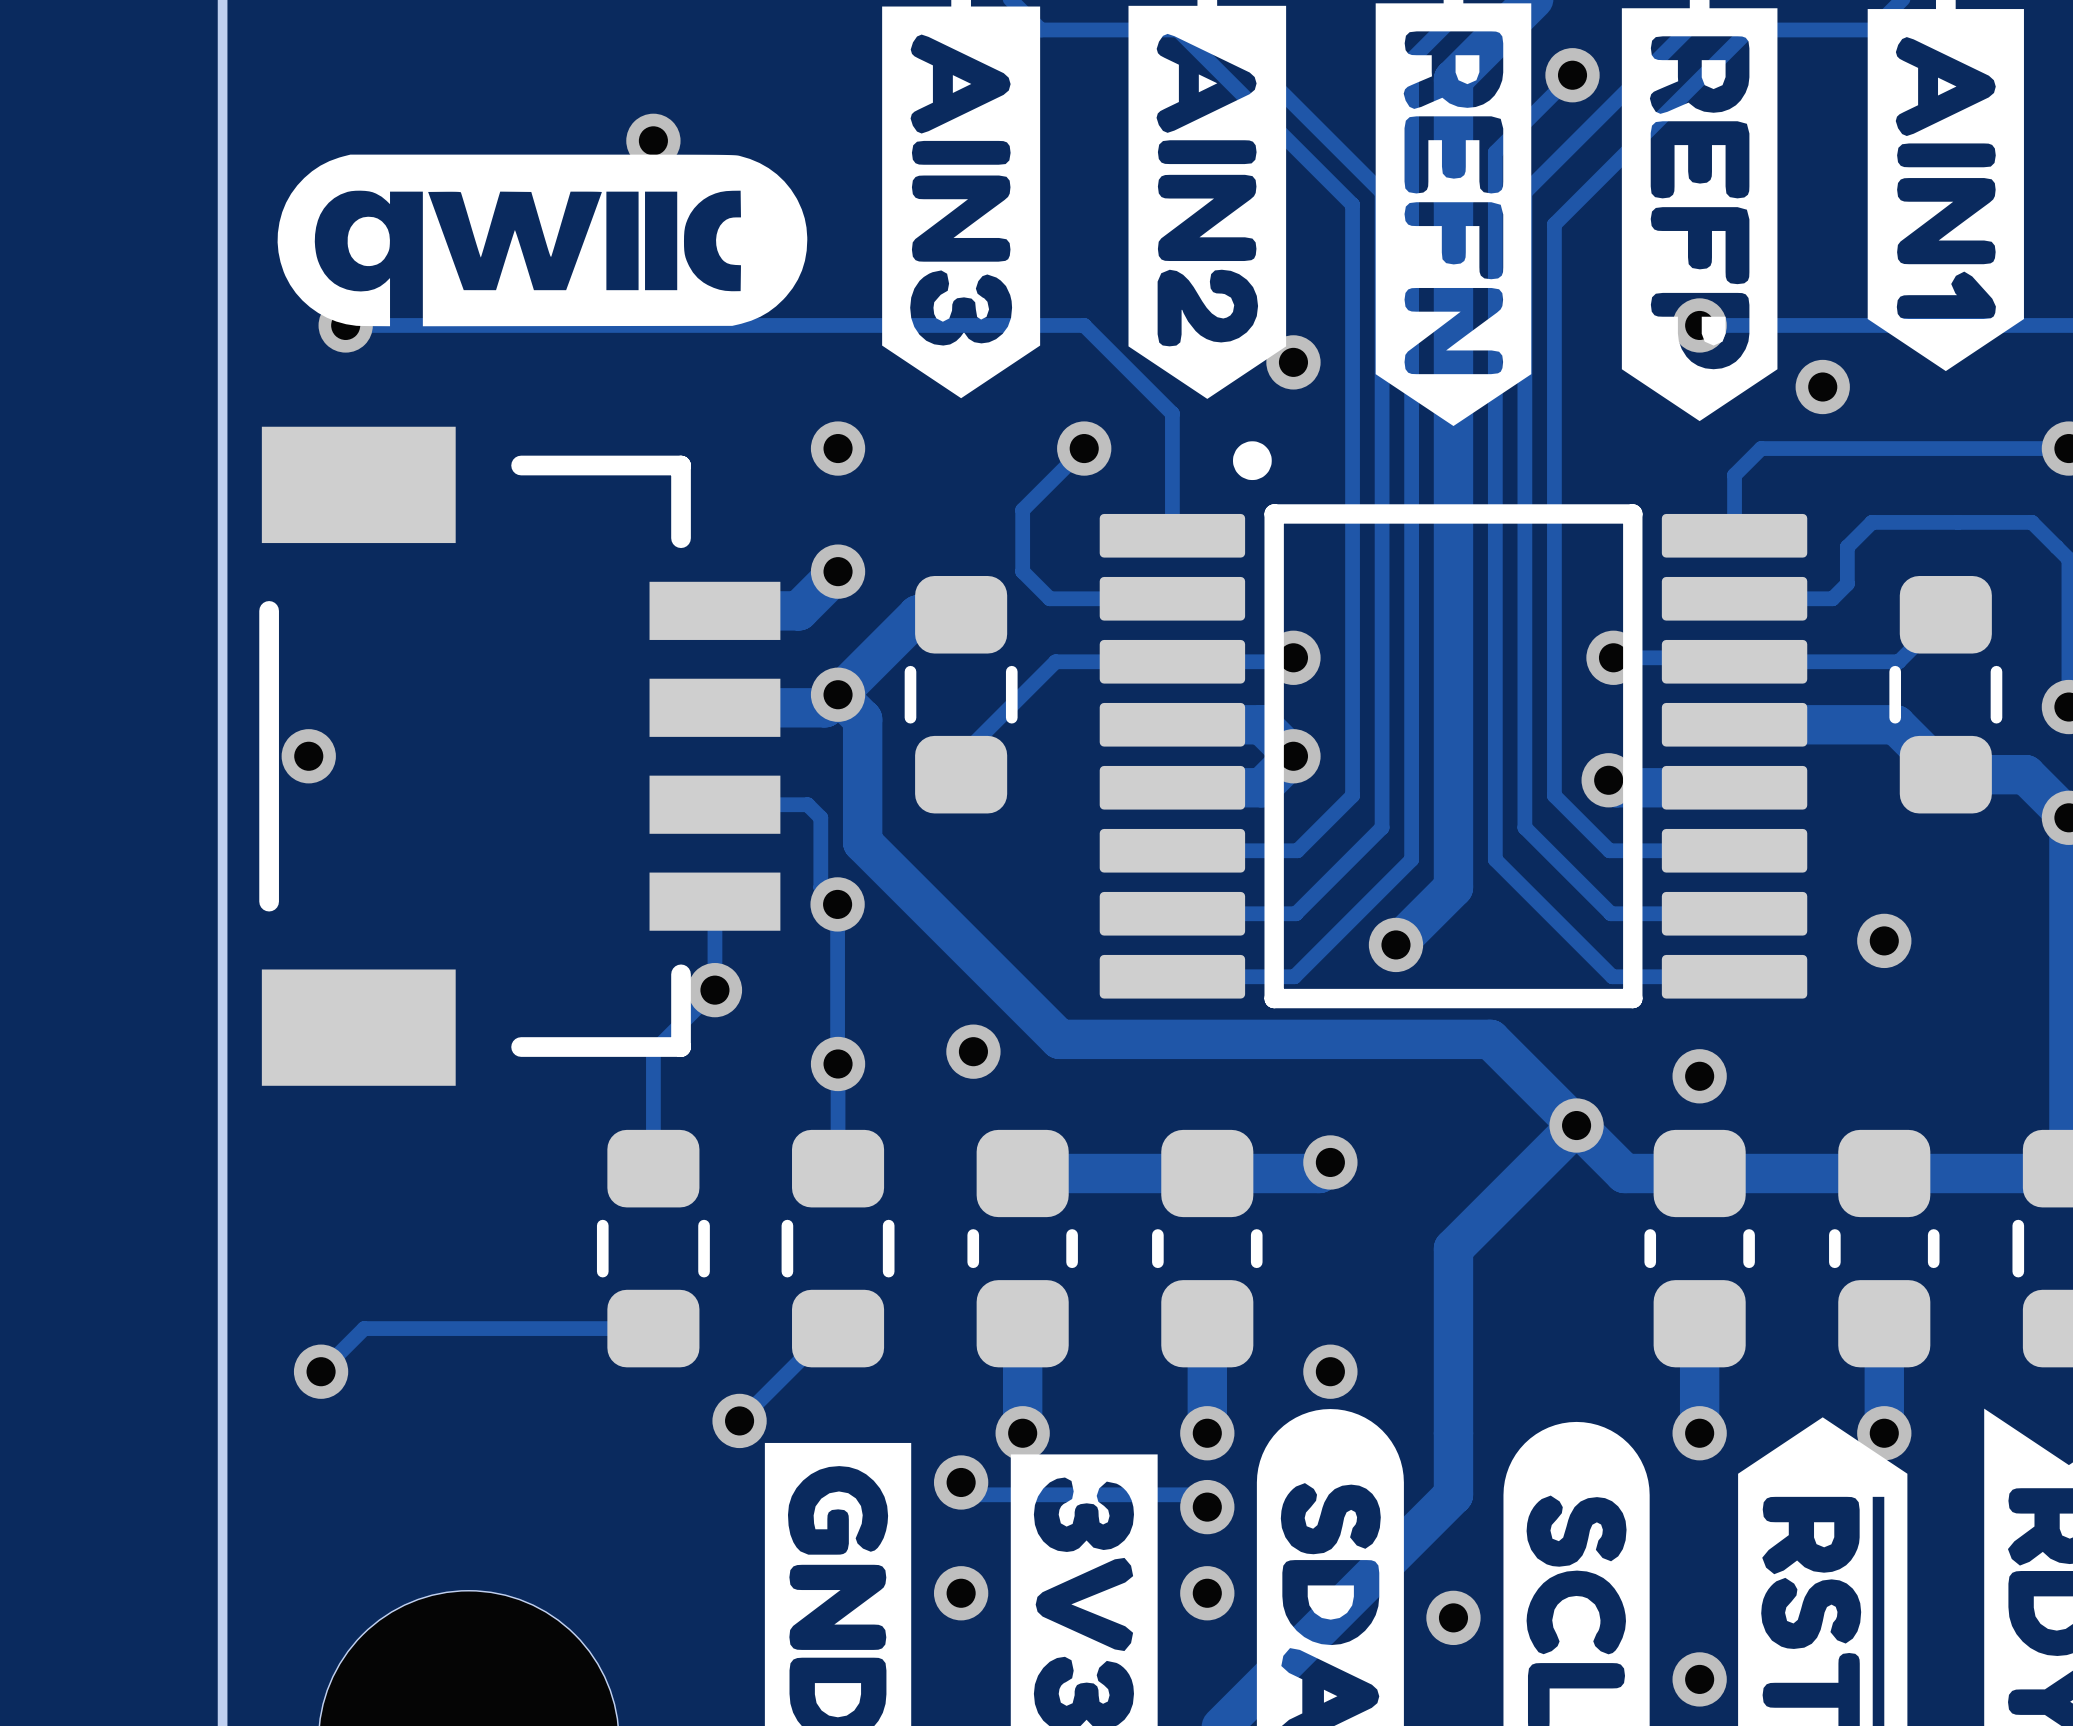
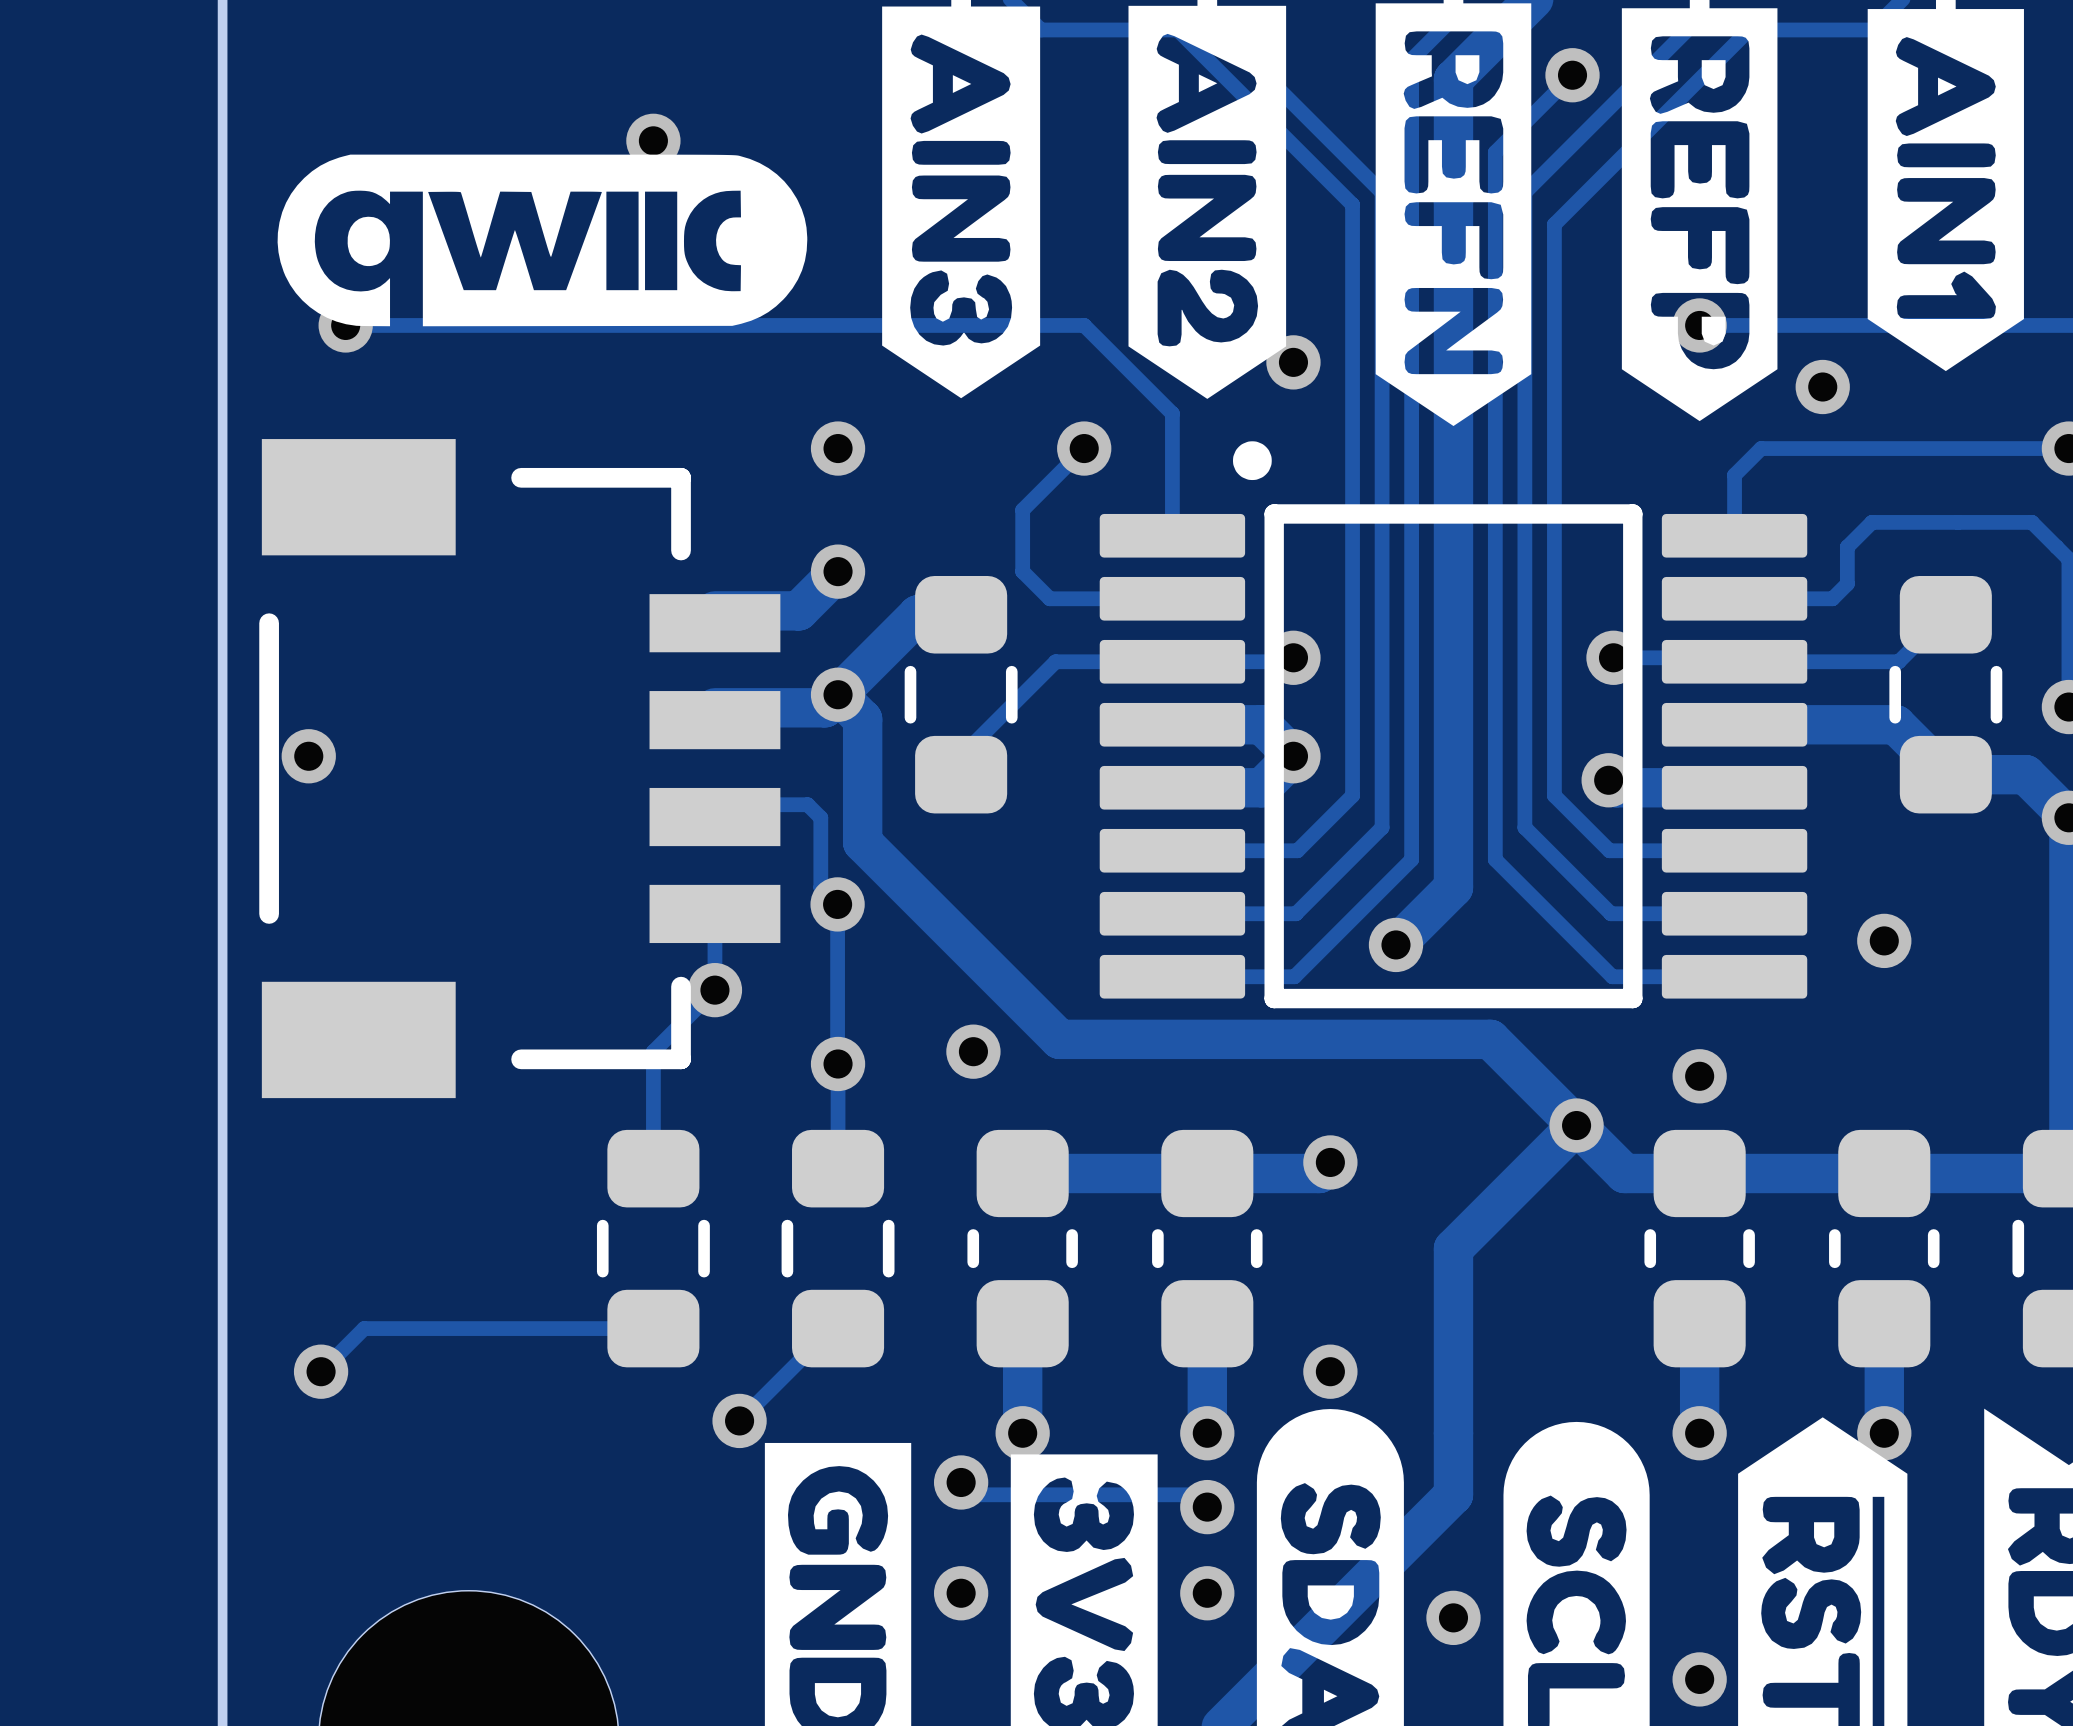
part position: (519, 756) -> (519, 768)

